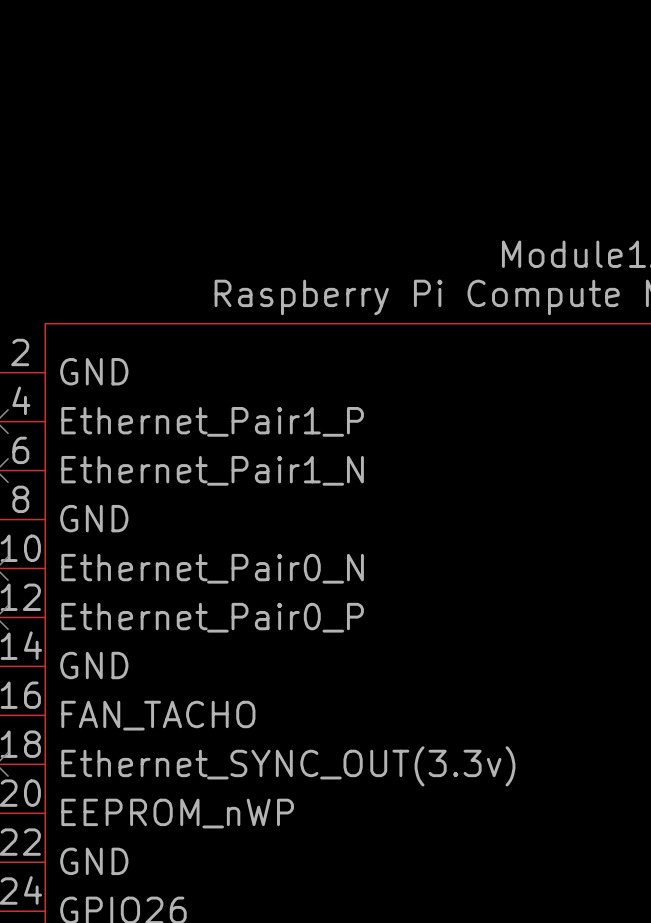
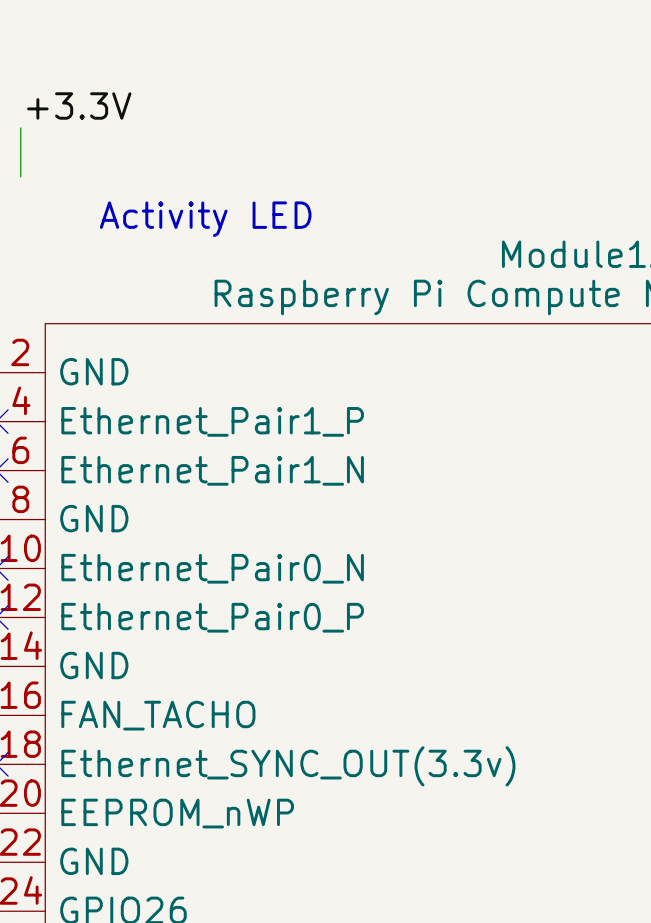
label: none -> +3.3V (79, 105)
wire: none -> (20, 127) (20, 176)
text: none -> Activity LED (205, 219)

